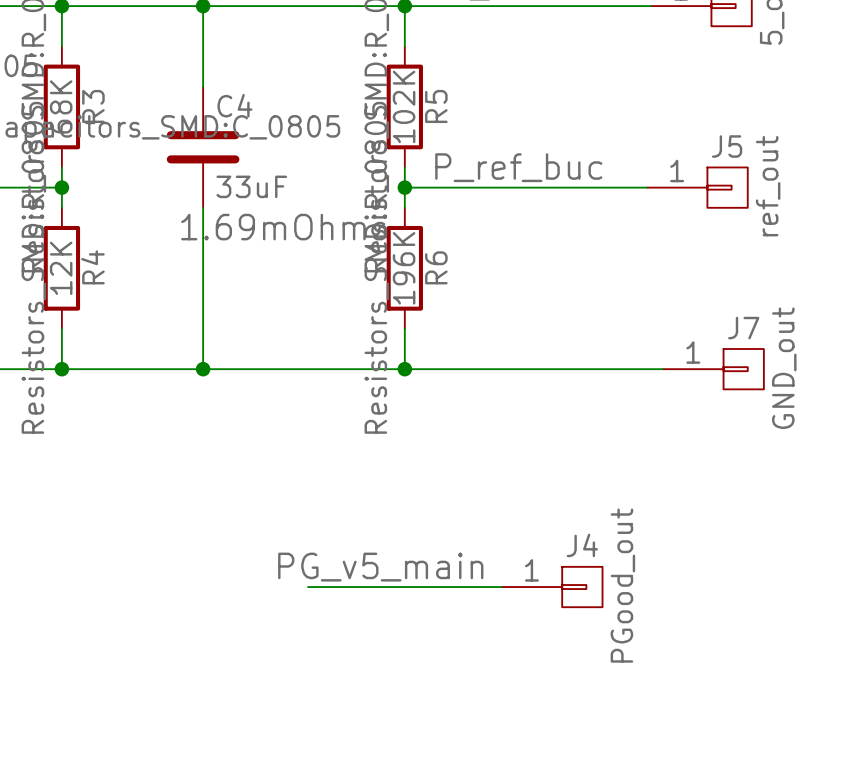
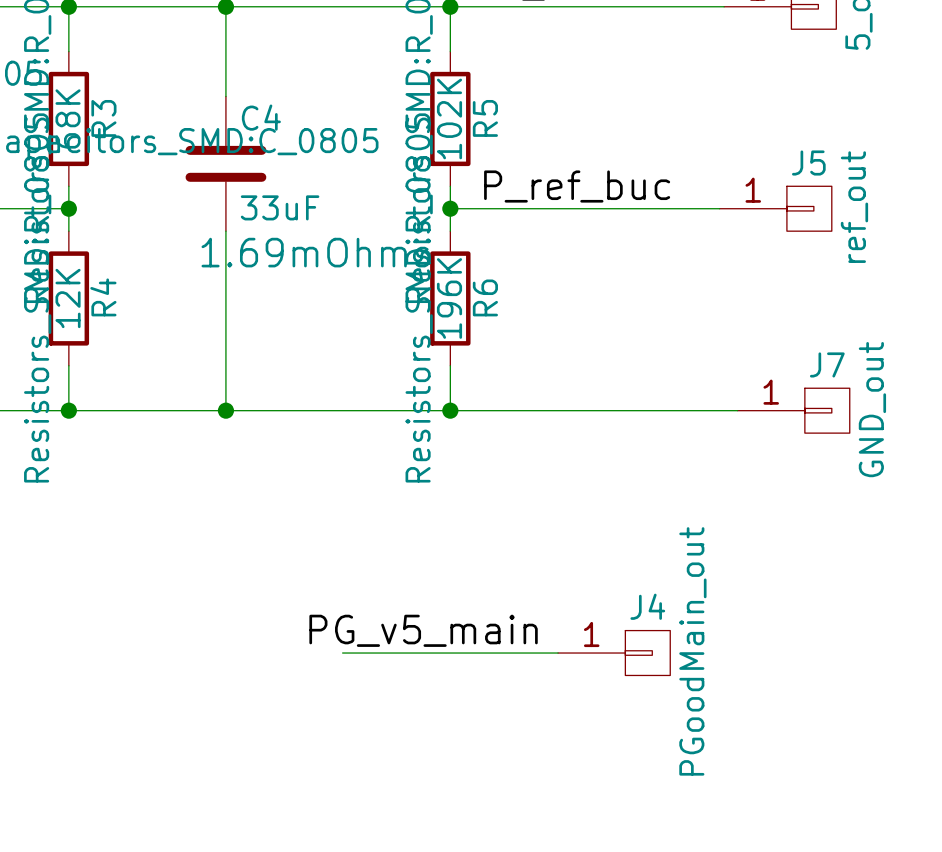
J4 value: PGood_out (622, 585) -> PGoodMain_out (692, 651)

